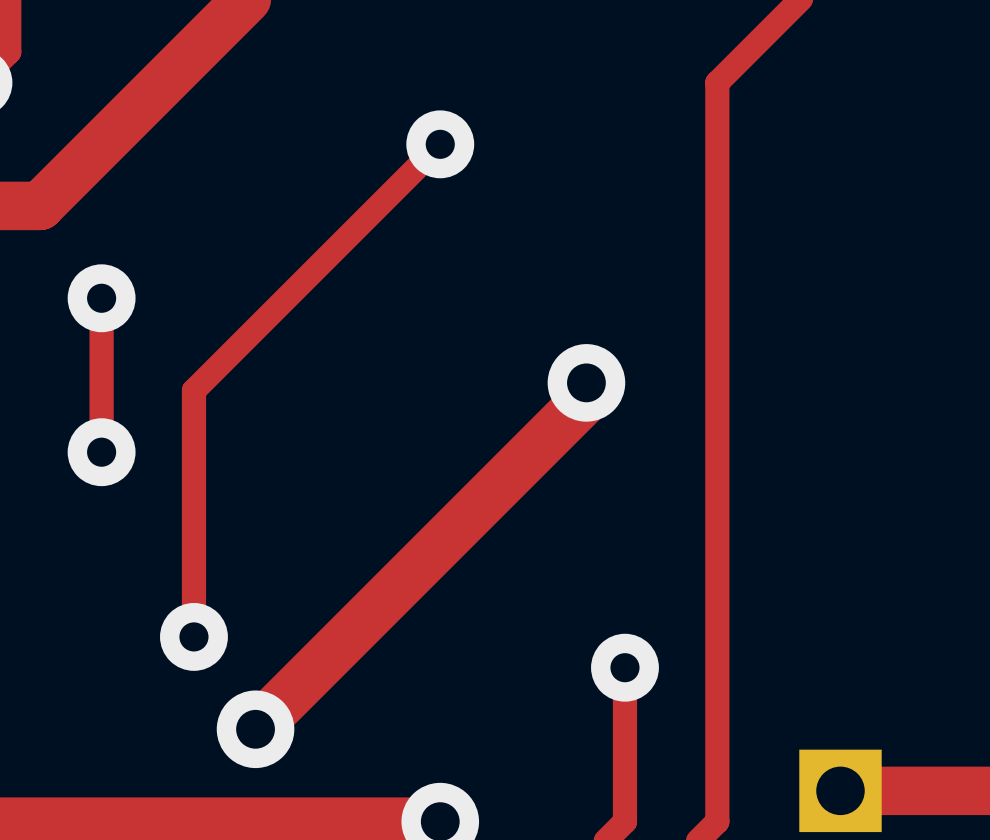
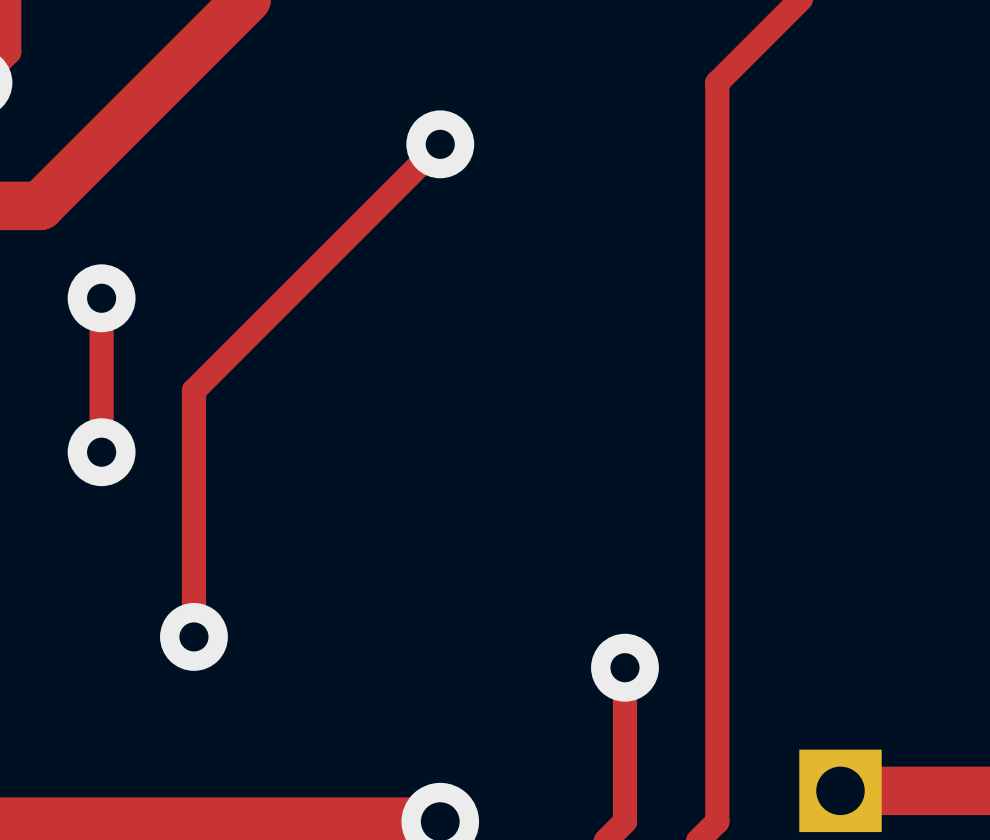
track: (586, 382) (586, 398) (255, 729) -> none
via: (586, 382) -> none
via: (255, 729) -> none

